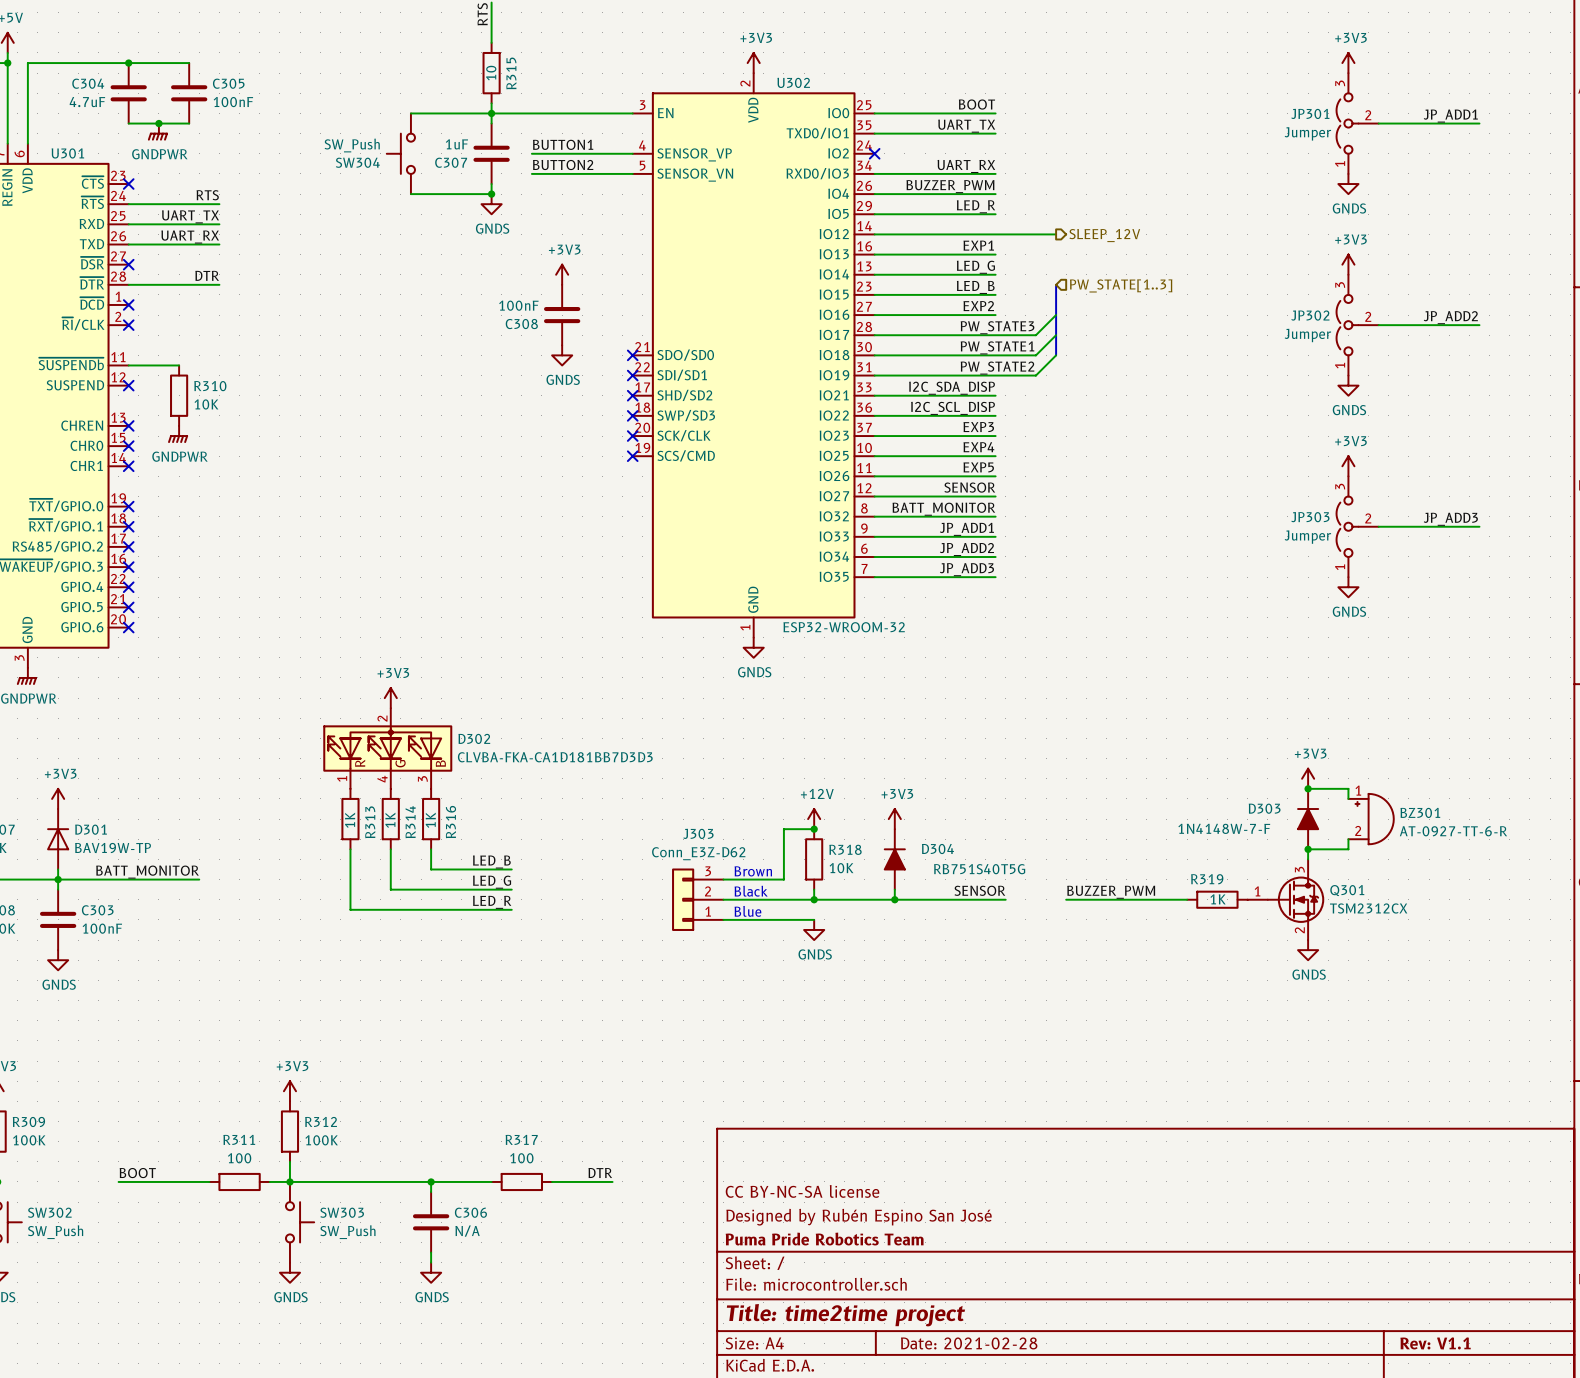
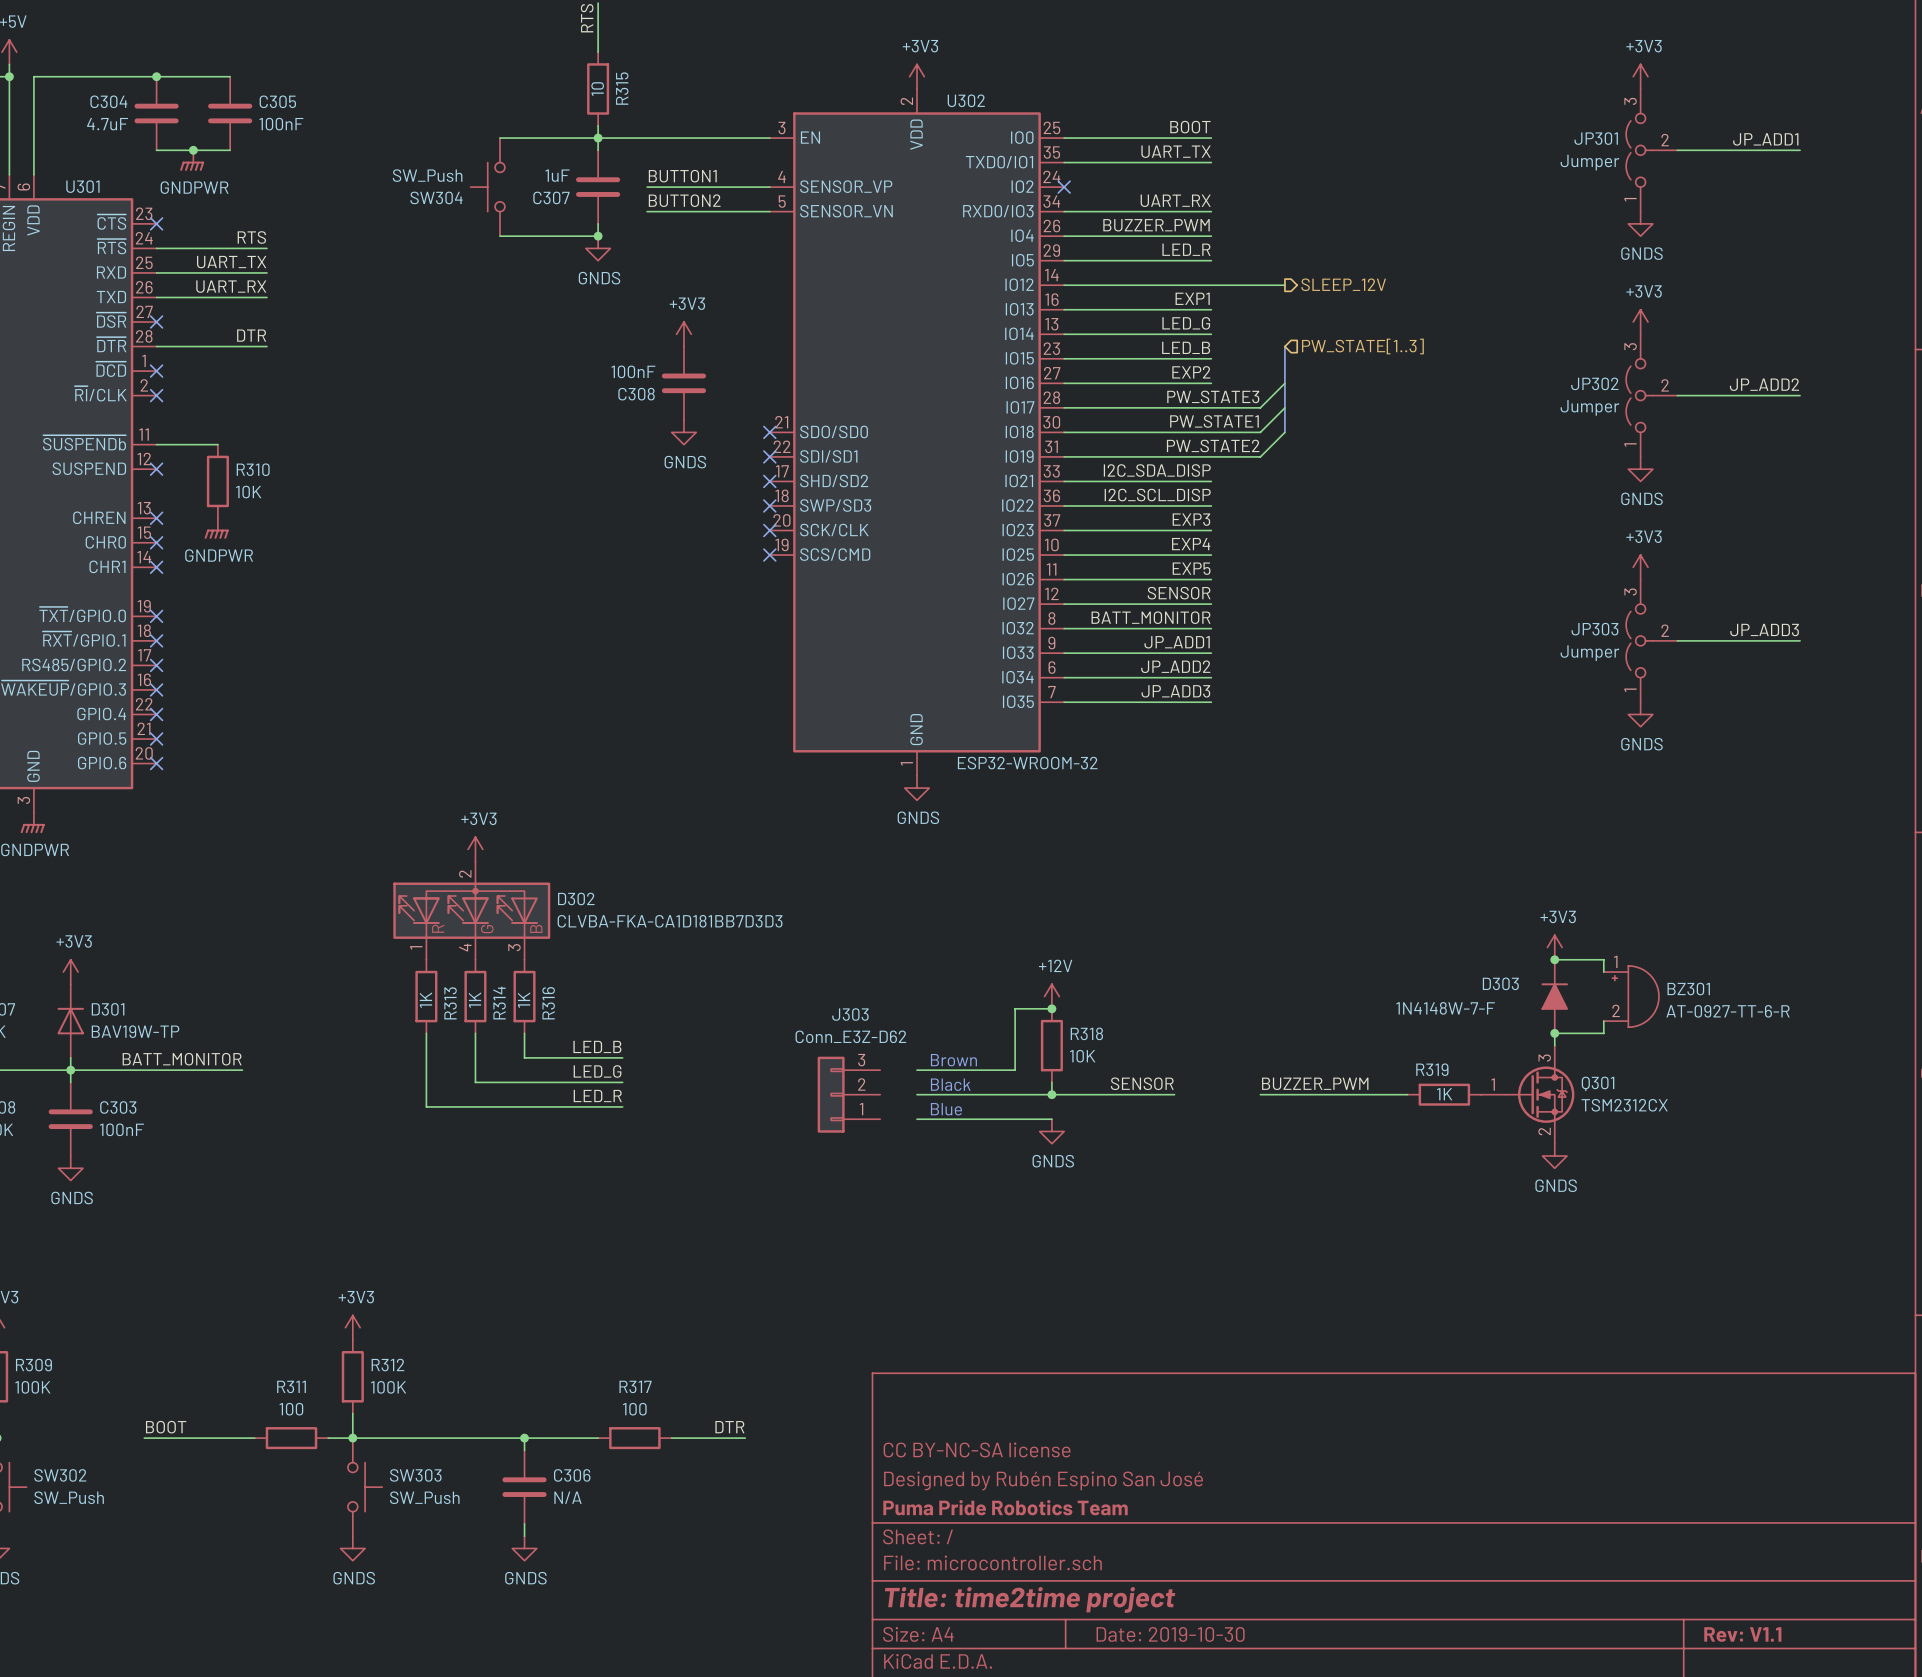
power symbol position: +3V3 (1308, 778) -> +3V3 (1554, 947)
wire: none -> (1554, 959) (1591, 959)
junction position: (1308, 788) -> (1554, 959)
wire: (1318, 788) (1348, 788) (1348, 798) -> (1603, 959) (1603, 972)
power symbol position: +12V (814, 819) -> +12V (1051, 996)
power symbol: +3V3 (894, 819) -> none
D303 position: (1308, 819) -> (1554, 996)
BZ301 position: (1371, 819) -> (1631, 996)
wire: (814, 829) (783, 829) (783, 879) -> (1051, 1008) (1015, 1008) (1015, 1070) (953, 1070)
junction: (814, 829) -> none
junction: none -> (1051, 1008)
wire: (1348, 839) (1348, 849) (1318, 849) -> (1603, 1021) (1603, 1033)
wire: (1308, 849) (1308, 859) -> (1591, 1033) (1554, 1033) (1554, 1045)
junction position: (1308, 849) -> (1554, 1033)
R318 position: (814, 859) -> (1051, 1045)
D304: RB751S40T5G (894, 859) -> none
text position: Brown (753, 871) -> Brown (953, 1060)
wire: (723, 879) (753, 879) -> none
wire: (814, 889) (814, 899) -> none
wire: (894, 889) (894, 899) -> (1051, 1082) (1051, 1094)
label position: SENSOR (979, 890) -> SENSOR (1142, 1083)
text position: Black (751, 891) -> Black (950, 1084)
label position: BUZZER_PWM (1111, 892) -> BUZZER_PWM (1315, 1083)
wire: (723, 899) (753, 899) -> none
junction: (814, 899) -> none
junction: none -> (1051, 1094)
junction: (894, 899) -> none
wire: (965, 899) (1005, 899) -> none
wire: (1156, 899) (1187, 899) -> (1260, 1094) (1297, 1094)
R319 position: (1217, 899) -> (1444, 1094)
Q301 position: (1285, 899) -> (1527, 1094)
text position: Blue (747, 911) -> Blue (946, 1109)
wire: (723, 919) (753, 919) -> none
wire: none -> (990, 1119) (1051, 1119)
power symbol position: GNDS (814, 929) -> GNDS (1051, 1131)
power symbol position: GNDS (1308, 950) -> GNDS (1554, 1156)
title block: Date: 2021-02-28 (969, 1343) -> Date: 2019-10-30 (1170, 1634)

